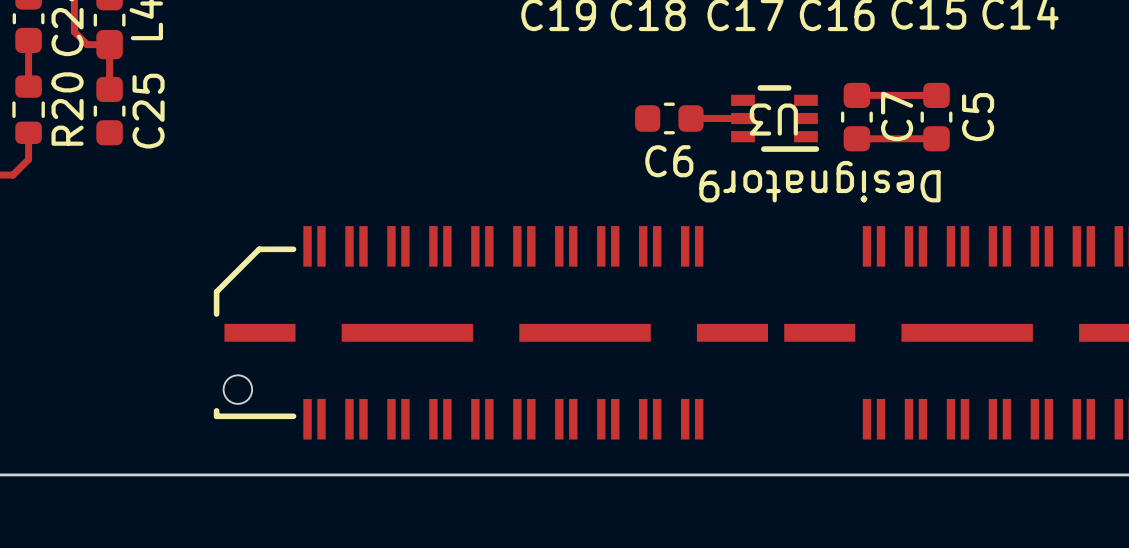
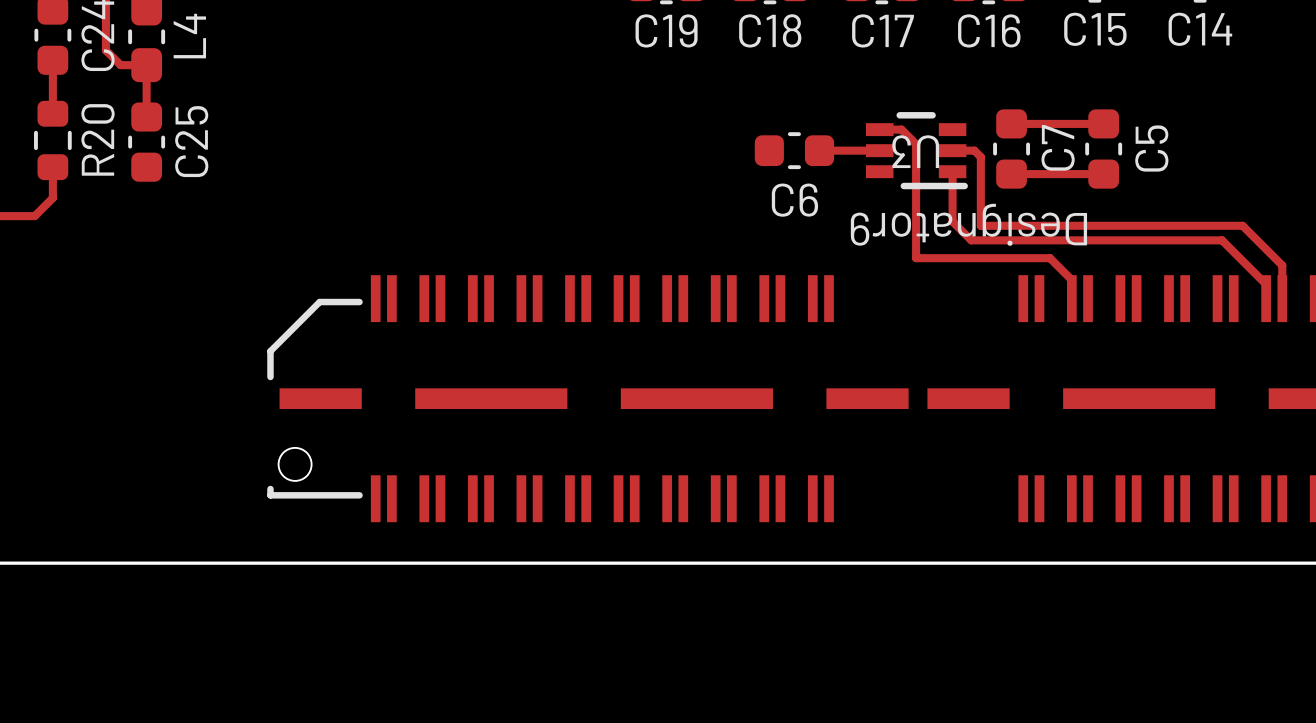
top track: none -> (879, 129) (901, 129) (916, 144) (916, 258) (1049, 258) (1071, 280) (1071, 298)
top track: none -> (952, 150) (974, 150) (980, 157) (980, 225) (1242, 225) (1282, 265) (1282, 298)
top track: none -> (952, 171) (952, 221) (971, 240) (1222, 240) (1266, 284) (1266, 298)

